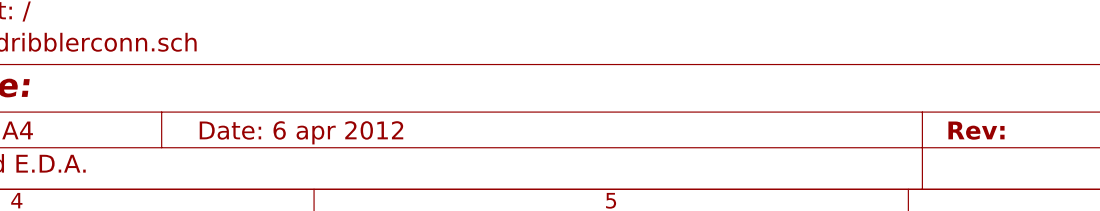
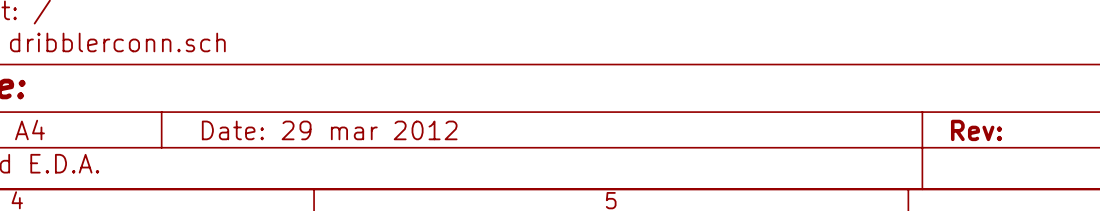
title block: Date: 6 apr 2012 (301, 132) -> Date: 29 mar 2012 (329, 130)

